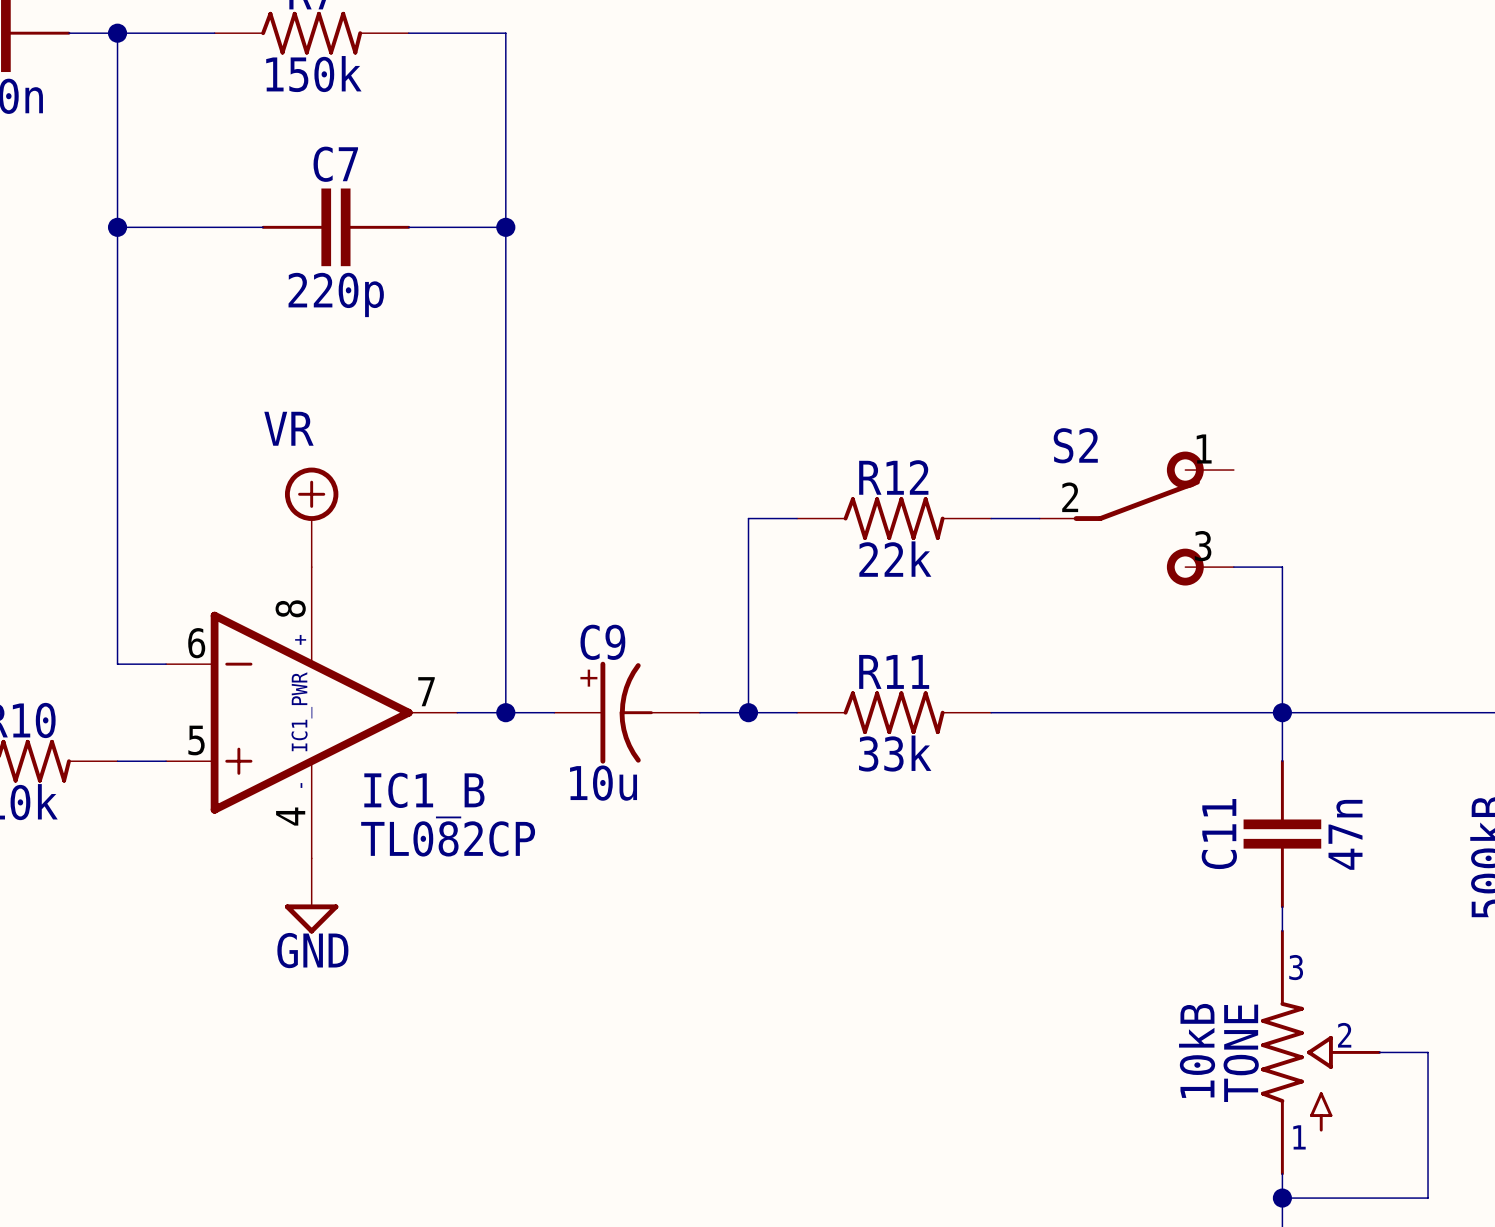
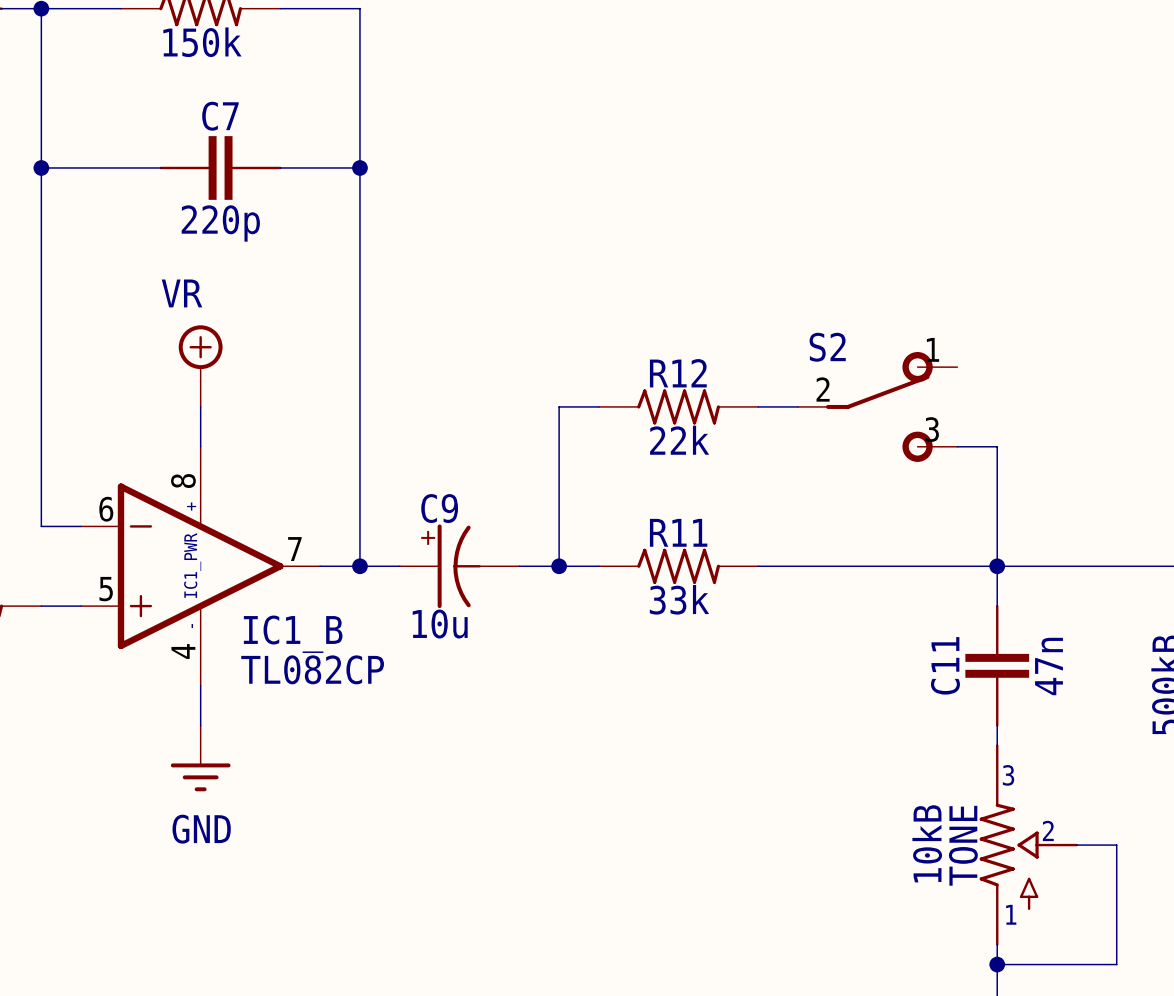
power symbol position: VR (311, 517) -> VR (200, 366)
power symbol: GND (311, 895) -> none
power symbol: none -> GND (200, 758)

